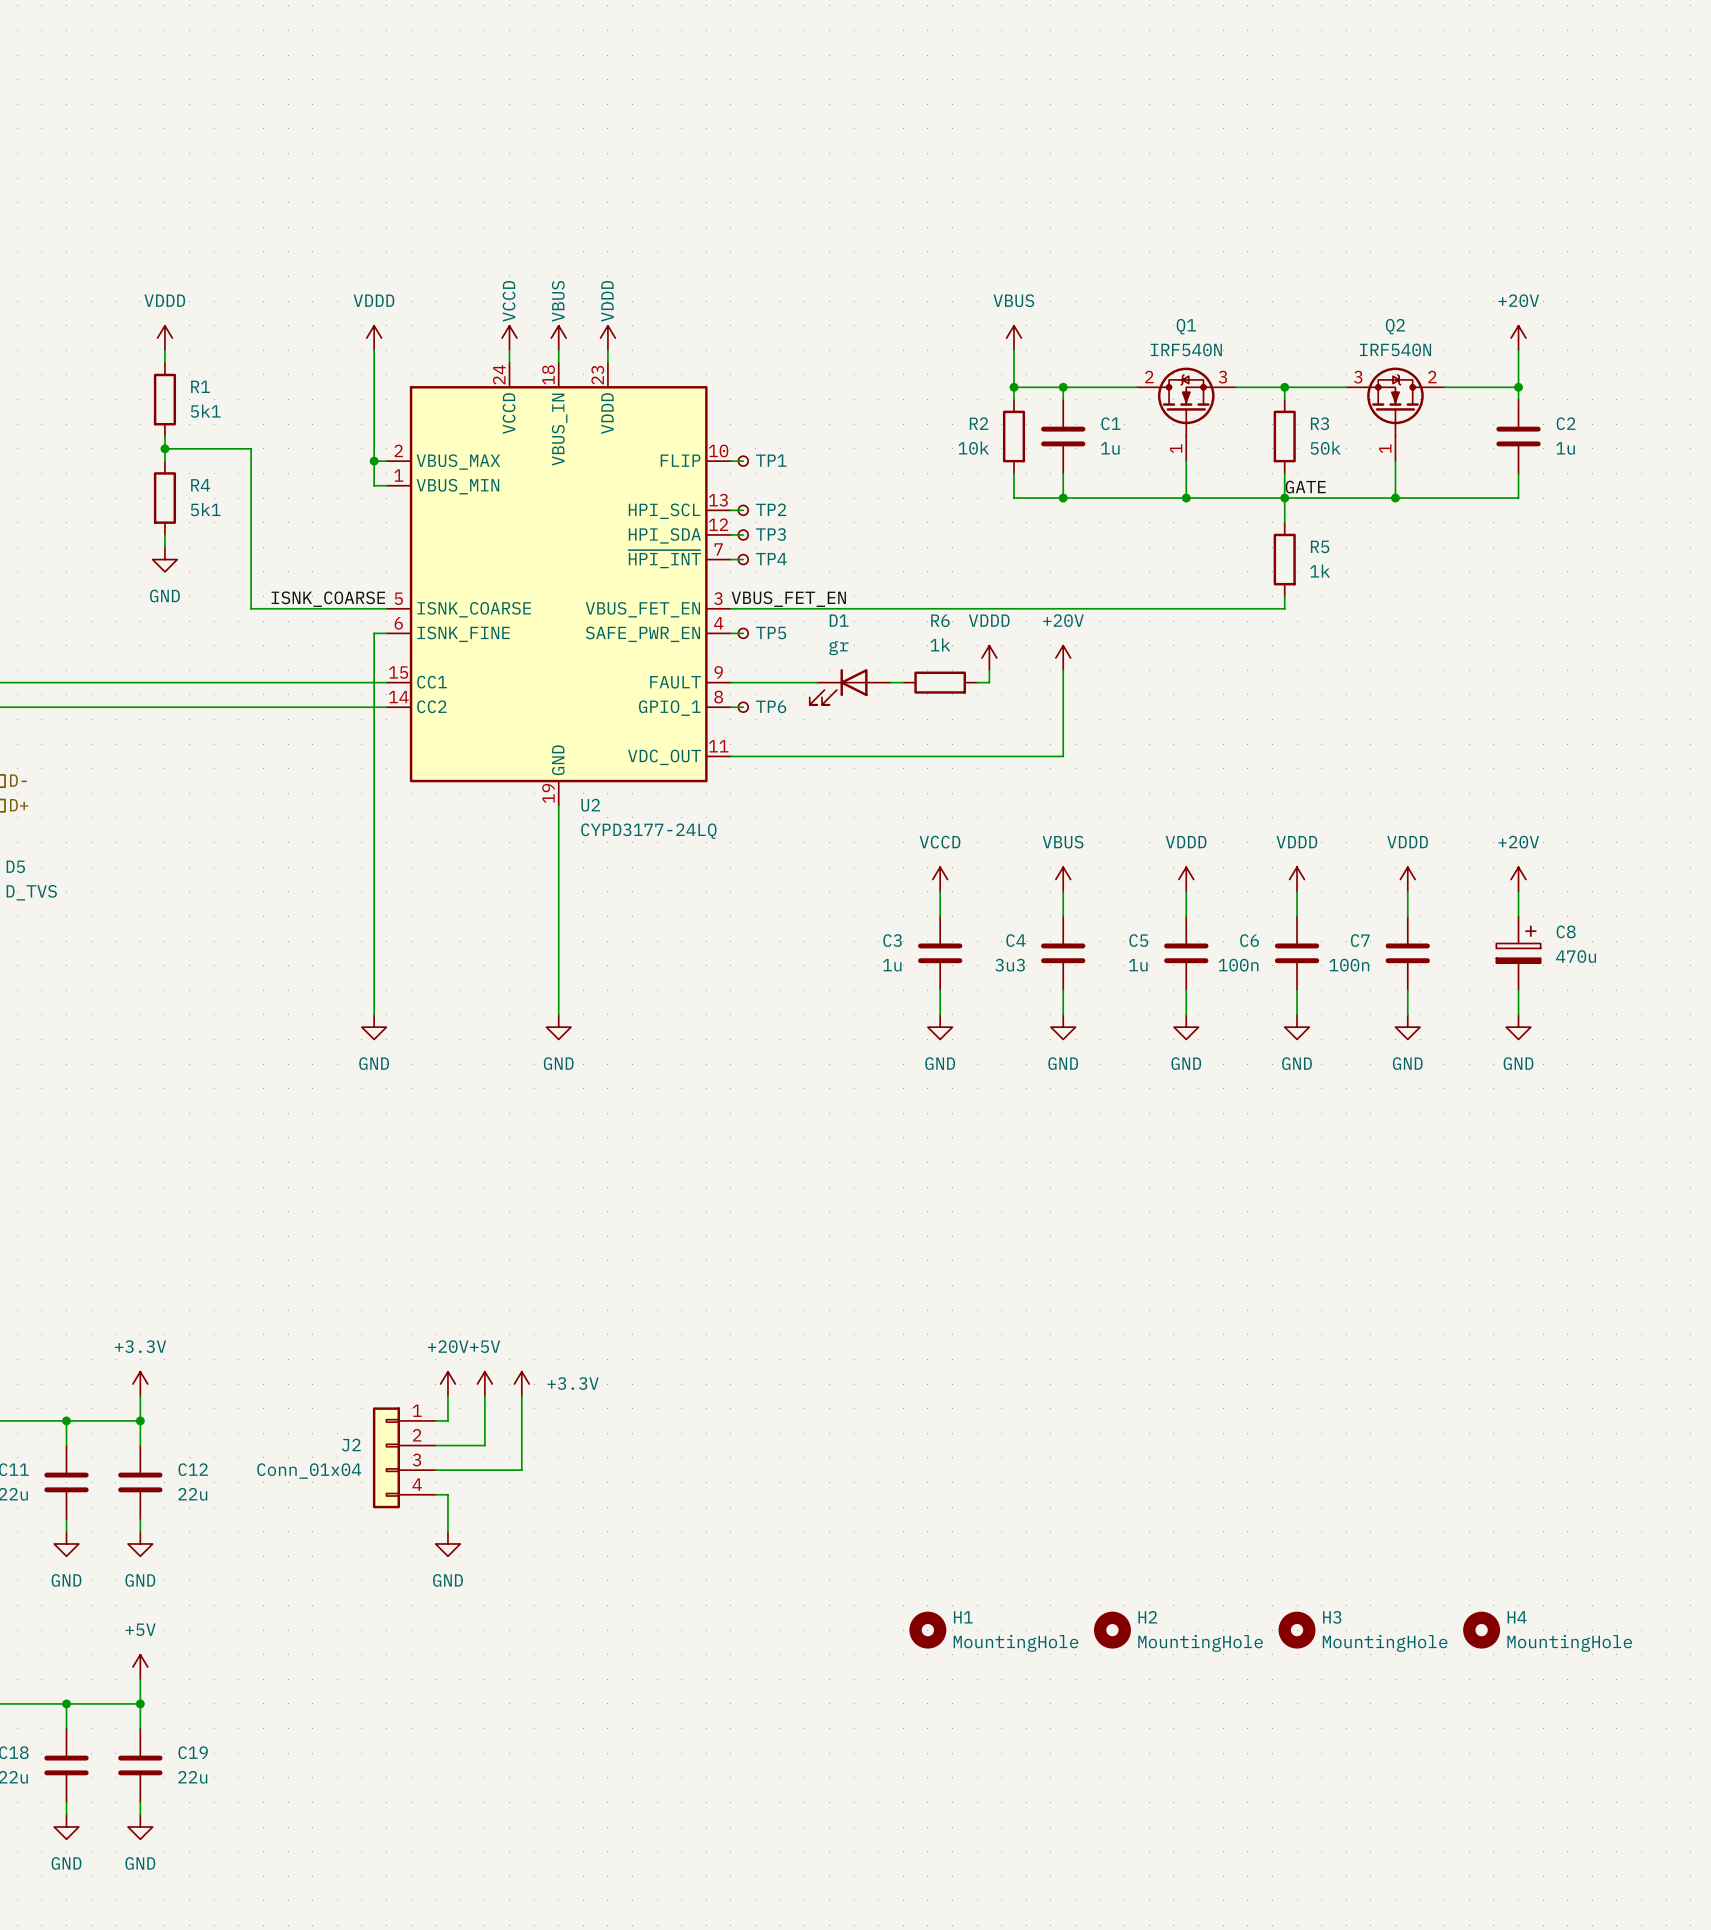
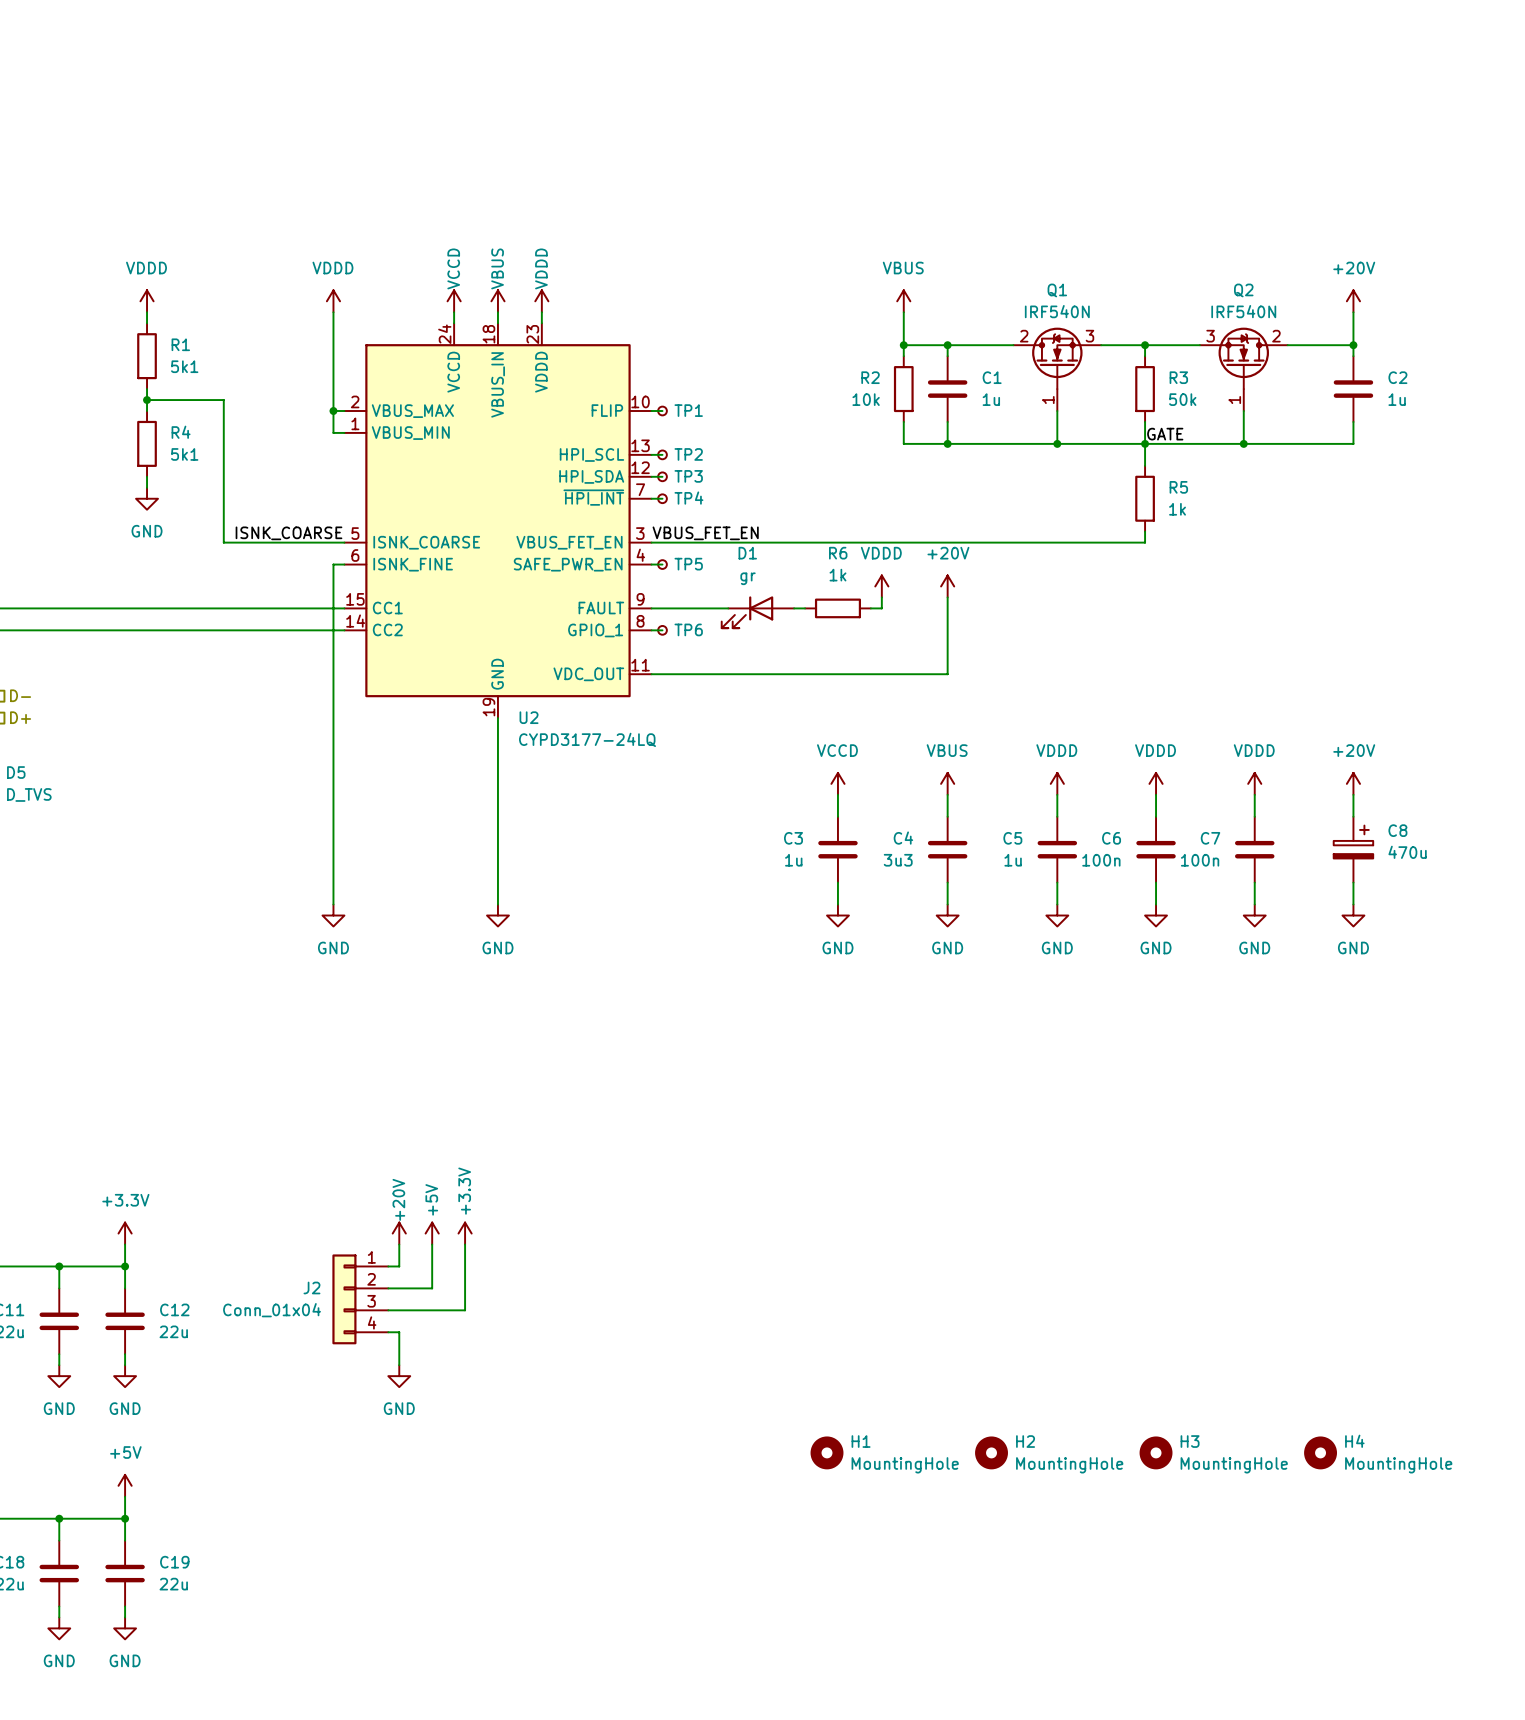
power symbol text rotation: 0° (448, 1346) -> 90° counterclockwise (398, 1199)
power symbol text rotation: 0° (485, 1346) -> 90° counterclockwise (431, 1199)
power symbol text rotation: 0° (573, 1383) -> 90° counterclockwise (464, 1191)
power symbol text position: +3.3V (573, 1383) -> +3.3V (464, 1191)

